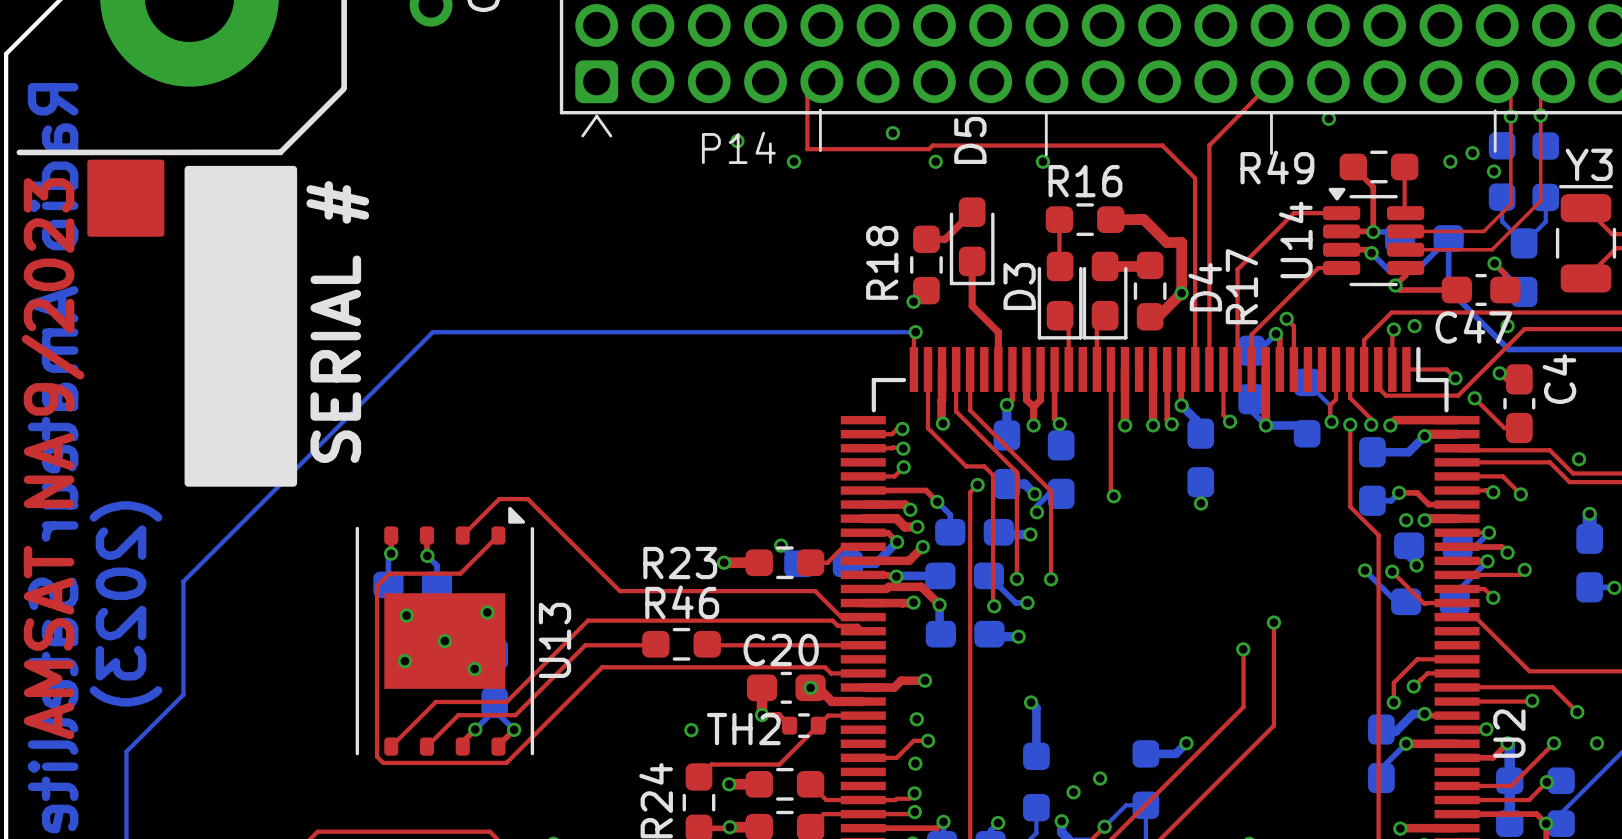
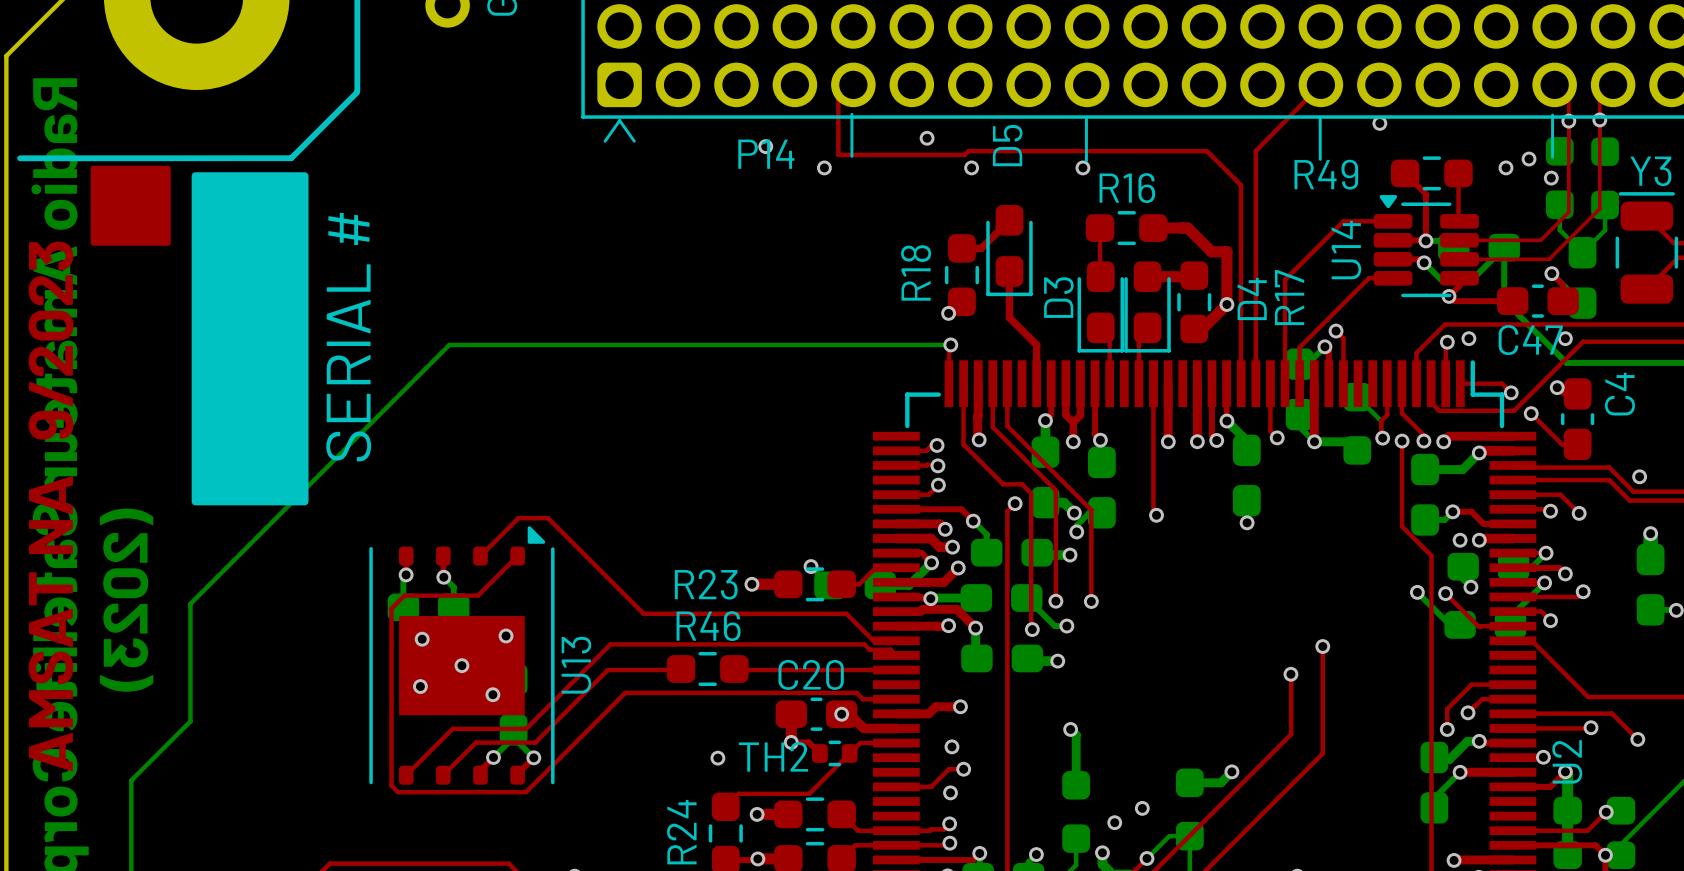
top track: (1553, 743) (1511, 785) (1457, 785) -> none
via: (1553, 743) -> none
via: (1596, 743) -> none

